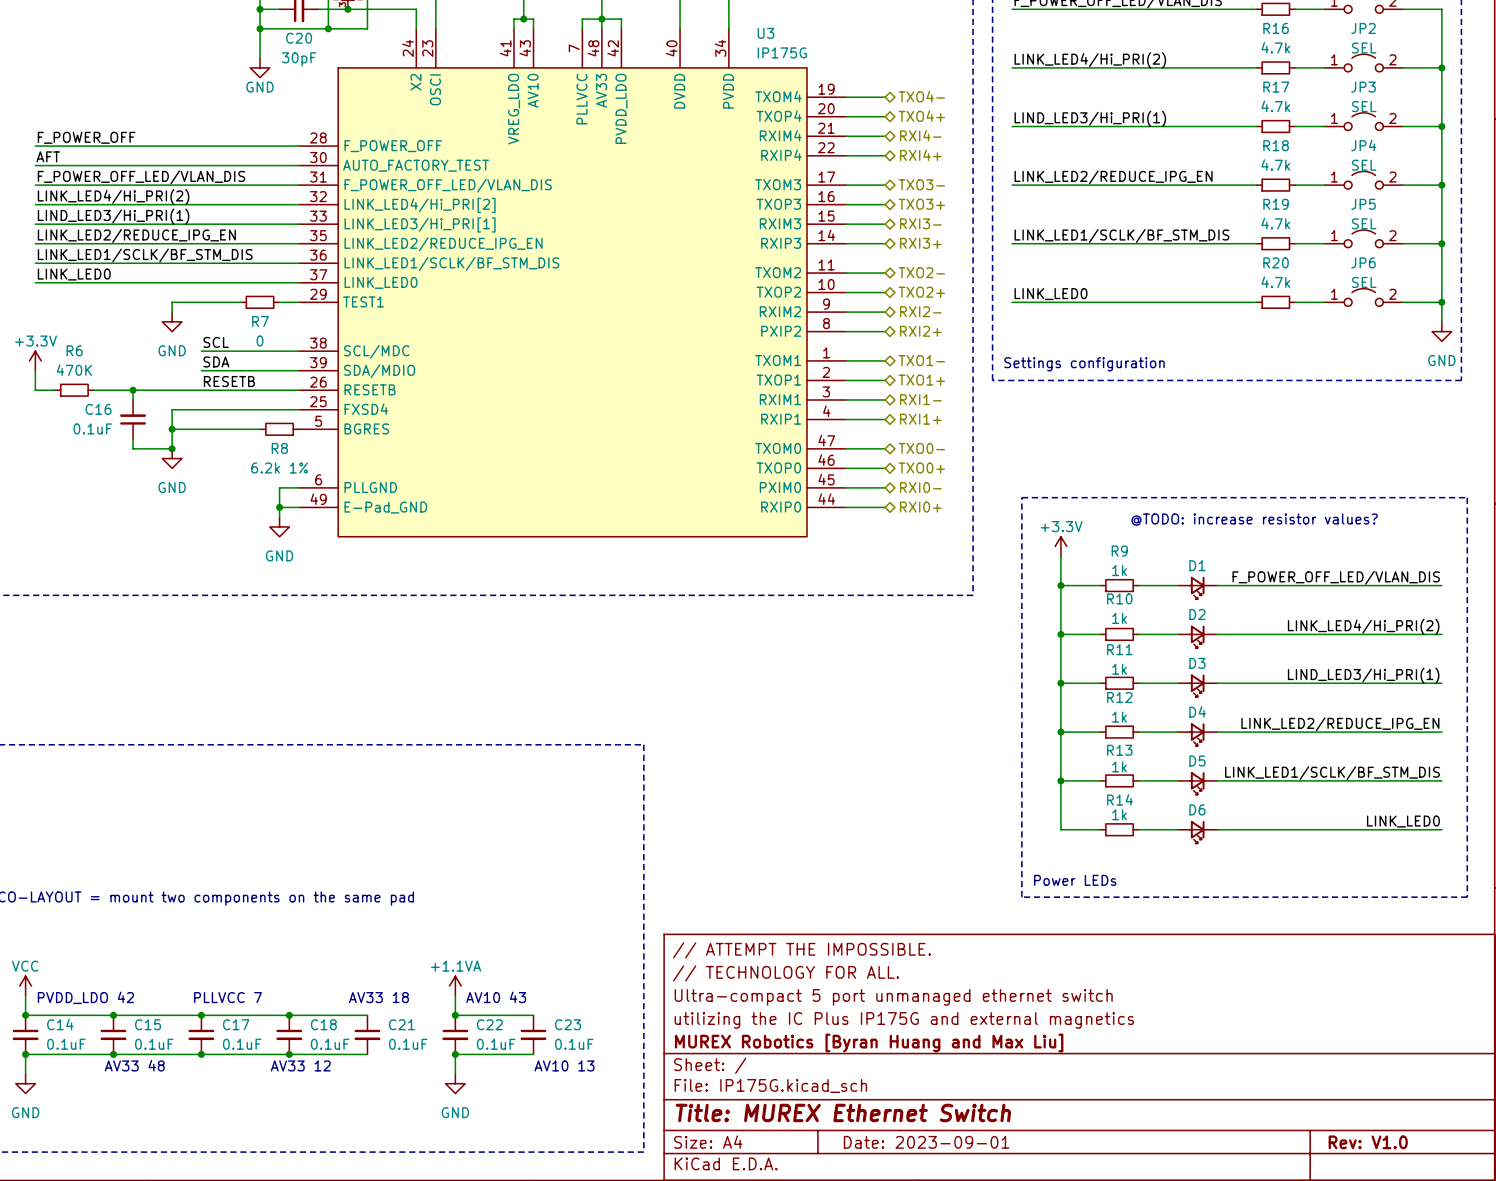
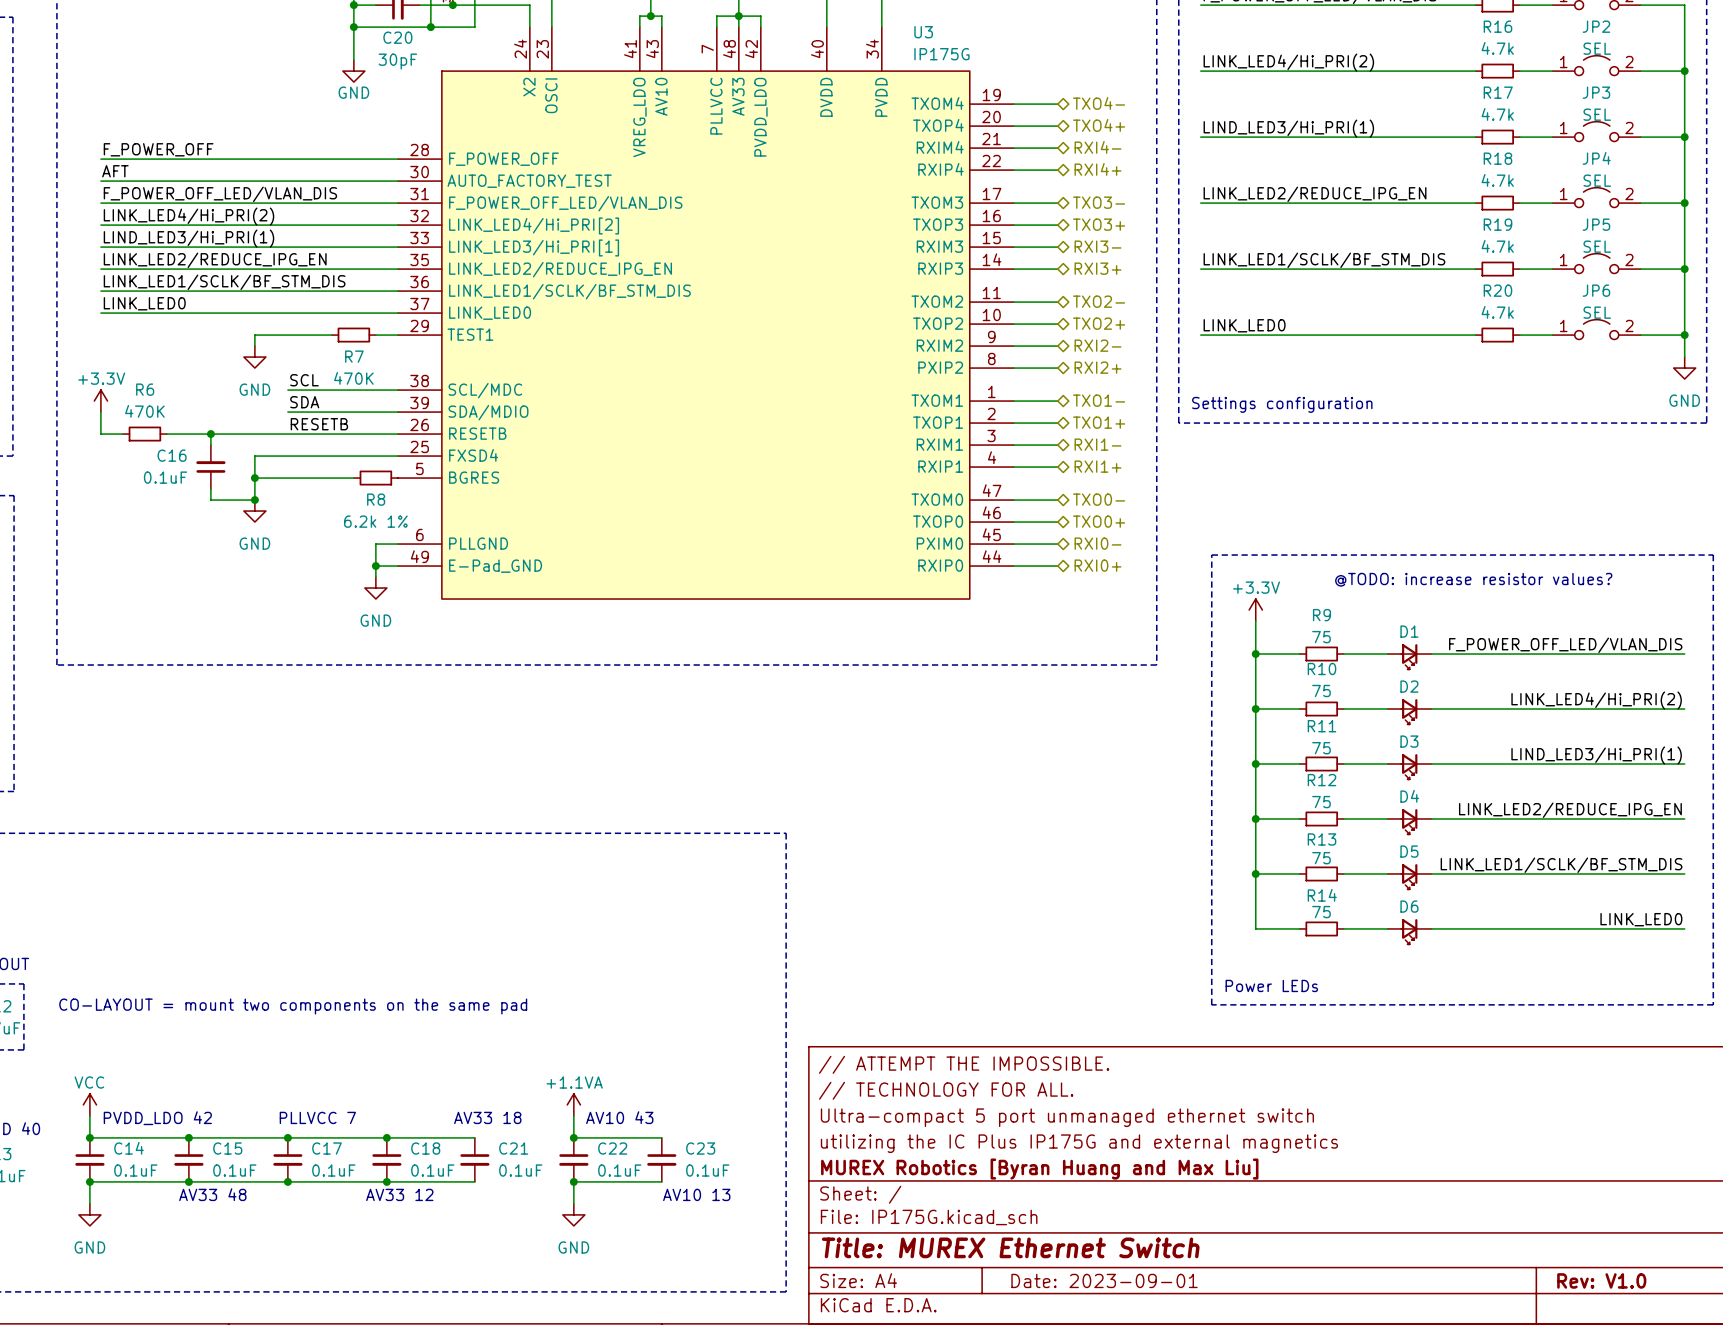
R7 value: 0 (260, 341) -> 470K (353, 378)
R9 value: 1k (1119, 570) -> 75 (1321, 637)
R10 value: 1k (1119, 618) -> 75 (1321, 690)
R11 value: 1k (1119, 669) -> 75 (1321, 748)
R12 value: 1k (1119, 717) -> 75 (1321, 802)
R13 value: 1k (1119, 766) -> 75 (1321, 858)
R14 value: 1k (1119, 814) -> 75 (1321, 912)

